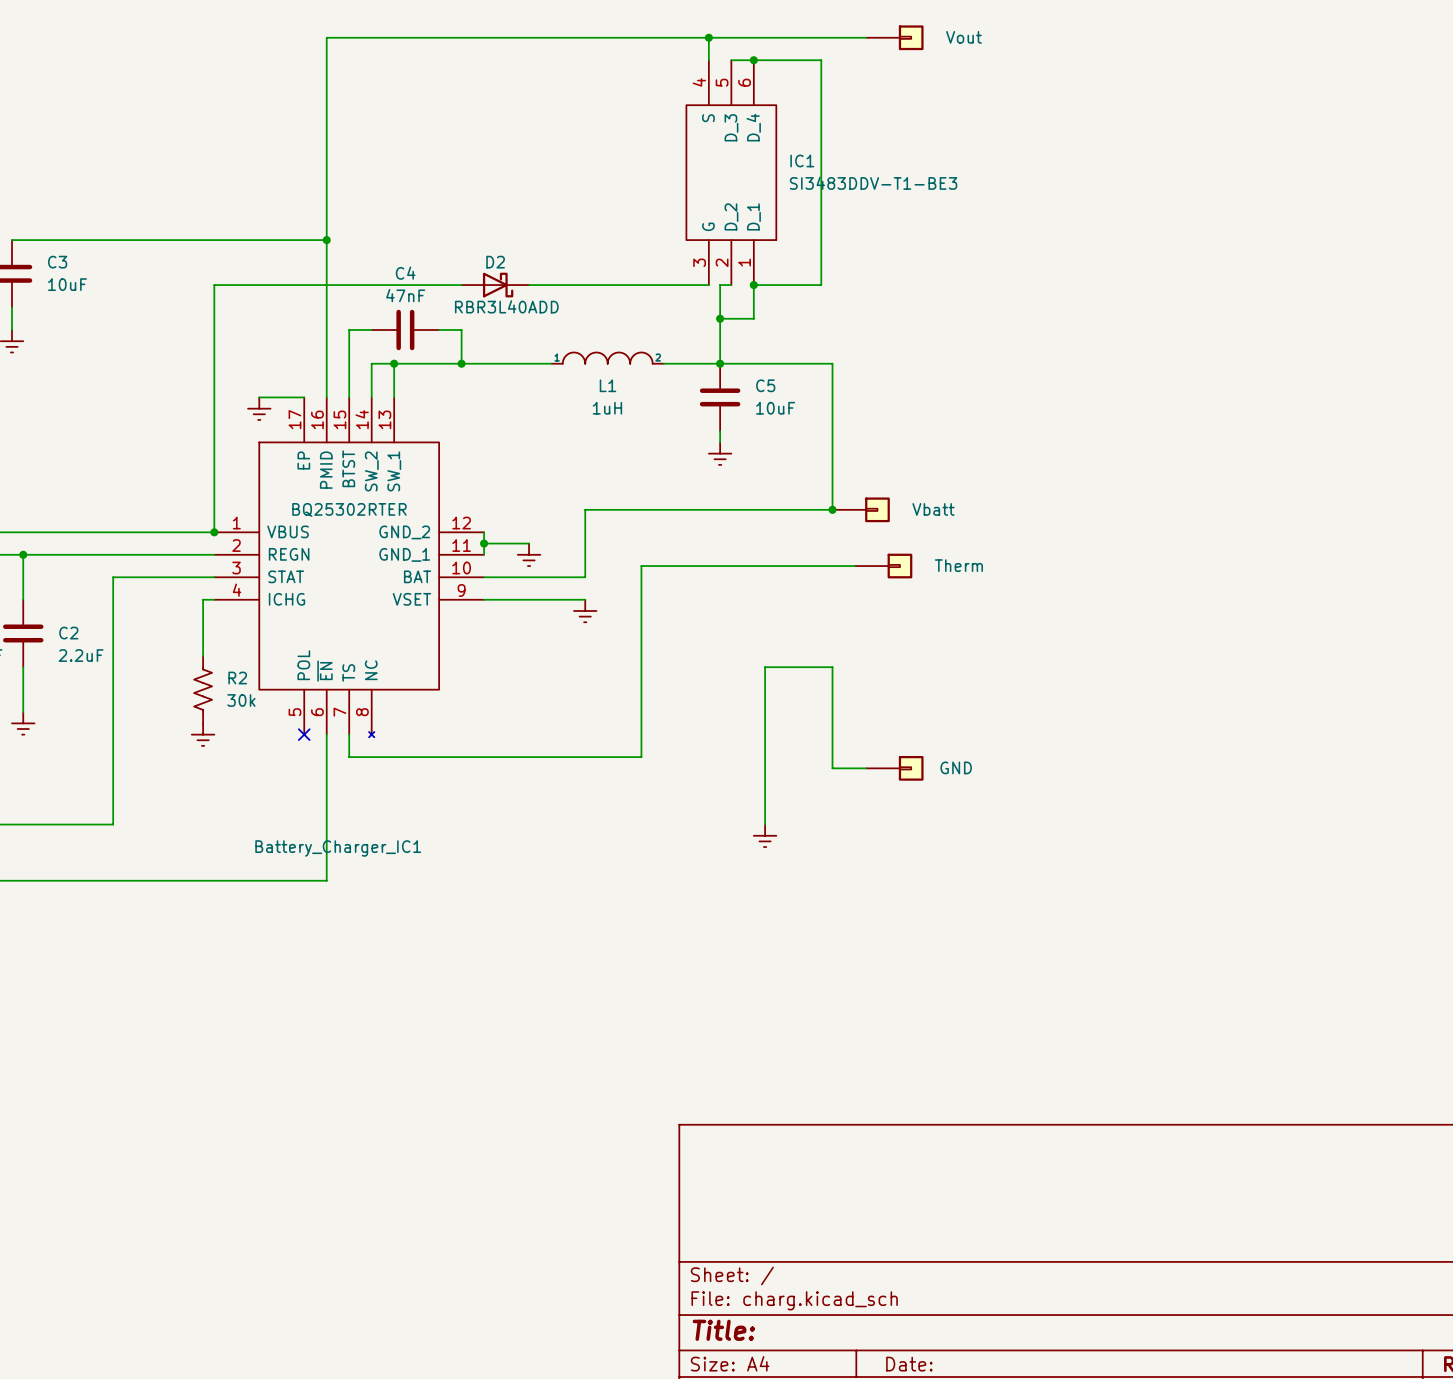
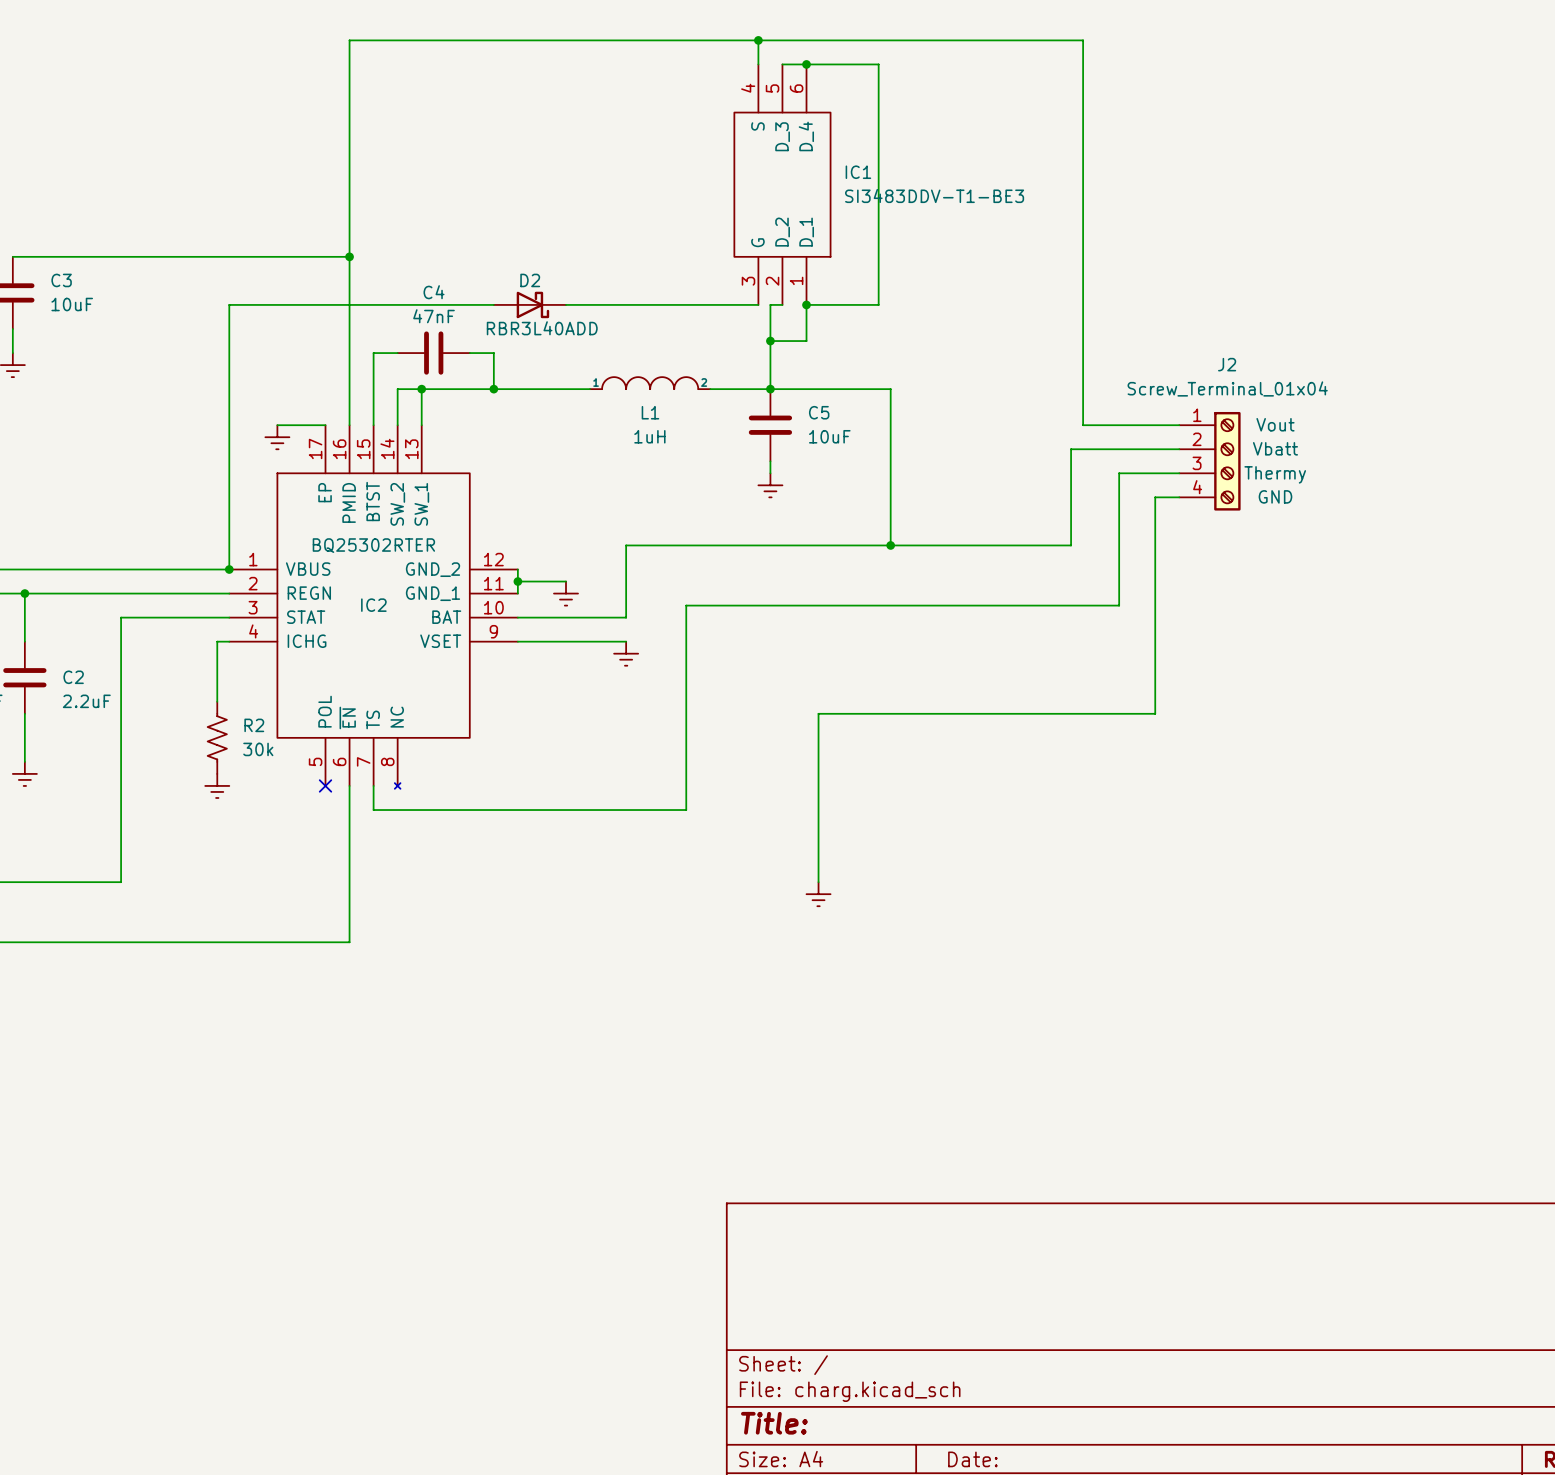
wire: none -> (926, 40) (1083, 40) (1083, 425) (1179, 425)
part: Vout (894, 37) -> none
wire: none -> (1179, 449) (1071, 449) (1071, 545) (890, 545)
J2: none -> Screw_Terminal_01x04 (1209, 461)
wire: none -> (1179, 473) (1119, 473) (1119, 605) (914, 605)
part: Vbatt (861, 509) -> none
part: Therm (883, 566) -> none
wire: (832, 667) (832, 768) (866, 768) -> (890, 713) (1155, 713) (1155, 497) (1179, 497)
part: GND (894, 768) -> none
Battery_Charger_IC1 name: Battery_Charger_IC1 (338, 848) -> IC2 (373, 605)

